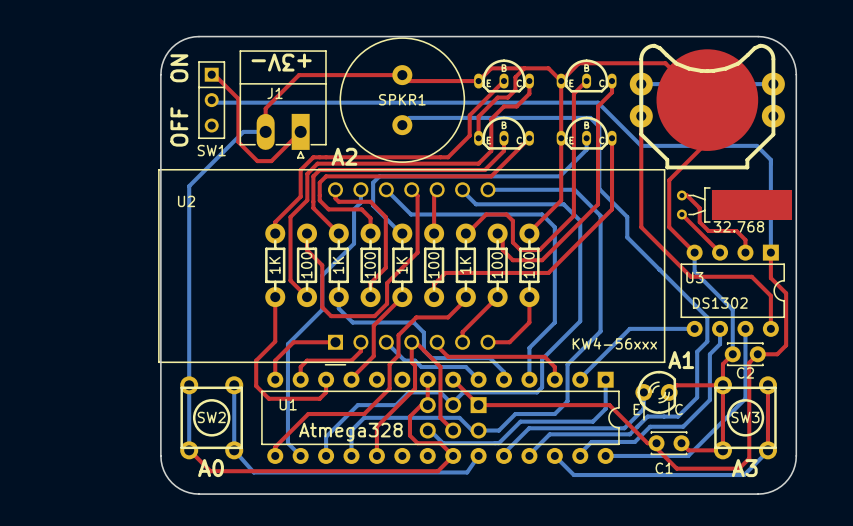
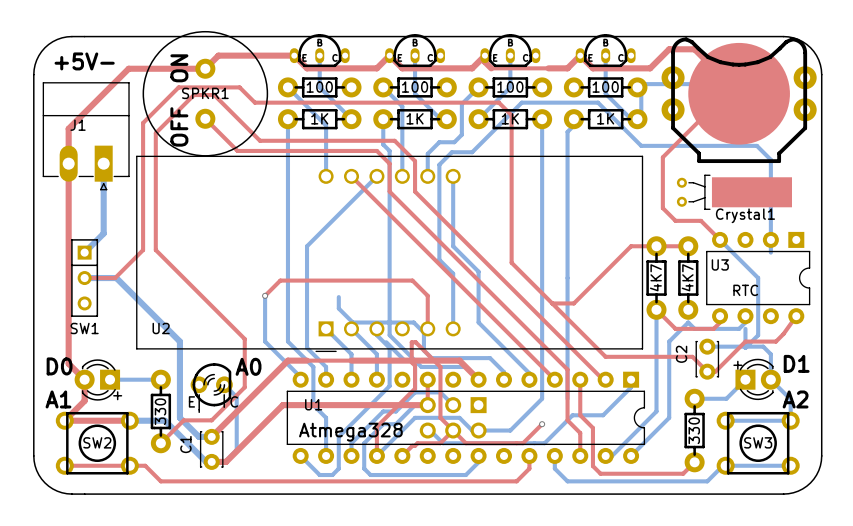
board edge: (199, 36) (184, 39) (172, 47) (163, 60) (160, 74) (161, 460) (163, 470) (172, 482) (184, 491) (199, 494) -> (199, 36) (62, 37) (48, 44) (41, 51) (36, 60) (33, 74) (33, 455) (36, 470) (48, 486) (66, 493) (199, 494)
board edge: (758, 36) (772, 39) (785, 47) (793, 60) (796, 74) (795, 460) (791, 475) (785, 482) (772, 491) (758, 494) -> (758, 36) (788, 36) (802, 41) (816, 55) (821, 74) (821, 460) (816, 475) (802, 488) (788, 493) (758, 494)
part: none -> (319, 50)
part: none -> (415, 50)
bottom track: none -> (319, 55) (319, 87) (351, 119)
bottom track: none -> (415, 55) (415, 93) (440, 119) (446, 119)
bottom track: none -> (510, 55) (510, 87) (478, 119)
bottom track: none -> (605, 55) (605, 93) (631, 119) (637, 119)
text: none -> +5V- (84, 61)
text: +3V- (281, 62) -> none
top track: (491, 68) (478, 81) (408, 81) (402, 75) (299, 75) (265, 108) (265, 131) -> (491, 68) (484, 61) (484, 55) (472, 68) (402, 68) (389, 55) (376, 68) (307, 68) (294, 55) (218, 55) (205, 68) (128, 68) (68, 128) (68, 363) (84, 379) (84, 400) (64, 420) (129, 420)
top track: (524, 68) (515, 77) (515, 89) (507, 97) (497, 97) (478, 116) (478, 138) -> none
top track: (548, 68) (561, 81) -> (548, 68) (567, 68) (580, 55) (592, 68) (650, 68) (669, 49) (694, 49) (739, 93)
top track: (211, 74) (216, 77) (238, 98) (238, 142) (257, 161) (271, 161) (300, 131) -> none
part position: (504, 75) -> (510, 50)
part position: (586, 75) -> (605, 50)
top track: (504, 81) (469, 115) (469, 135) (448, 157) (313, 157) (300, 170) (300, 196) (275, 222) (275, 233) -> none
top track: (529, 81) (529, 93) (516, 106) (504, 106) (491, 119) (491, 150) (478, 163) (317, 163) (307, 173) (307, 200) (290, 217) (290, 280) (307, 297) -> none
top track: (561, 81) (578, 63) (665, 63) (702, 100) (707, 100) (707, 142) (669, 180) (669, 227) (694, 252) -> none
top track: (561, 81) (561, 200) (529, 233) -> none
top track: (586, 81) (573, 93) (573, 215) (539, 250) (520, 250) (512, 242) (512, 220) (506, 214) (486, 214) (465, 233) -> none
top track: (612, 81) (612, 92) (598, 106) (598, 204) (542, 260) (512, 260) (502, 250) (502, 238) (497, 233) -> none
bottom track: none -> (287, 87) (326, 125) (326, 176)
part: none -> 100 (319, 87)
bottom track: none -> (383, 87) (402, 106) (402, 176)
part: none -> 100 (415, 87)
bottom track: none -> (478, 87) (461, 104) (461, 134) (454, 142) (439, 142) (427, 153) (427, 176)
part: none -> 100 (510, 87)
part: none -> 100 (605, 87)
top track: none -> (739, 93) (726, 93) (662, 157) (662, 208) (675, 220) (700, 220) (720, 239)
bottom track: (211, 100) (214, 102) (521, 102) -> (453, 328) (453, 273) (439, 259) (439, 164) (451, 152) (472, 152) (521, 102)
SW1 position: (211, 100) -> (84, 278)
SPKR1 position: (402, 100) -> (205, 93)
part: none -> (739, 100)
J1 position: (283, 104) -> (86, 136)
part: (707, 106) -> none
top track: (641, 116) (641, 227) (690, 276) (751, 276) (770, 295) (770, 328) -> none
top track: none -> (205, 118) (237, 150) (376, 150) (389, 163) (389, 191) (567, 369) (567, 420) (580, 433) (580, 455)
part: none -> 1K (319, 119)
bottom track: none -> (383, 119) (383, 144) (389, 150) (389, 335) (415, 360) (415, 392) (395, 411) (383, 411) (351, 443)
part: none -> 1K (415, 119)
part: none -> 1K (510, 119)
part: none -> 1K (605, 119)
bottom track: (402, 125) (409, 117) (590, 117) (599, 126) (599, 189) (627, 217) (627, 237) (707, 317) (707, 341) (697, 351) (697, 397) (678, 416) (647, 416) (629, 434) (549, 434) (529, 455) -> none
bottom track: (265, 131) (243, 131) (189, 186) (189, 450) -> none
part: (504, 133) -> none
part: (586, 133) -> none
top track: (504, 138) (504, 150) (484, 170) (319, 170) (313, 176) (313, 208) (338, 233) -> none
top track: (529, 138) (491, 176) (326, 176) (319, 182) (319, 200) (328, 209) (361, 209) (370, 218) (370, 233) -> none
bottom track: (586, 138) (586, 149) (559, 176) (379, 176) (373, 182) (373, 205) (402, 233) -> none
top track: (612, 138) (612, 209) (548, 272) (445, 272) (434, 284) (434, 297) -> none
text: A2 (344, 156) -> none
bottom track: none -> (103, 163) (103, 233) (84, 252)
U2 footprint: [158, 169, 666, 366] -> [136, 155, 644, 352]
bottom track: none -> (376, 176) (307, 246) (307, 347) (326, 366) (326, 379)
top track: (335, 189) (335, 198) (338, 201) (370, 201) (385, 217) (385, 267) (370, 283) (370, 297) -> none
bottom track: (360, 189) (360, 202) (354, 209) (354, 243) (322, 275) (322, 309) (287, 344) (287, 443) (300, 455) -> (376, 328) (376, 335) (389, 347) (389, 386) (338, 436) (338, 468) (332, 475) (319, 475) (300, 455)
bottom track: (386, 189) (411, 214) (542, 214) (554, 227) (554, 322) (529, 347) (529, 373) -> (453, 176) (453, 246) (478, 271) (478, 322) (529, 373)
top track: (411, 189) (417, 195) (417, 252) (387, 283) (387, 303) (374, 316) (331, 316) (322, 307) (322, 265) (307, 250) (307, 233) -> none
top track: (437, 189) (434, 192) (434, 233) -> none
bottom track: (462, 189) (476, 204) (563, 204) (580, 220) (580, 321) (542, 359) -> (542, 119) (542, 359)
bottom track: (487, 189) (574, 189) (600, 215) (600, 331) (567, 364) -> (573, 119) (573, 125) (567, 131) (567, 364)
Crystal1: none -> (734, 192)
top track: (681, 195) (687, 195) (699, 208) (699, 222) (708, 231) (736, 231) (745, 239) (745, 252) -> none
U2 name position: U2 (186, 201) -> U2 (161, 328)
part: 32.768 (734, 204) -> none
top track: (681, 214) (720, 252) -> none
bottom track: none -> (720, 239) (758, 278) (758, 335) (745, 347)
top track: none -> (688, 246) (631, 246) (573, 303) (552, 303)
bottom track: (694, 252) (694, 271) (732, 309) (732, 354) -> none
top track: (770, 252) (770, 278) (786, 293) (786, 345) (777, 354) (757, 354) (749, 362) (749, 458) (739, 468) (676, 468) (656, 448) (656, 443) (647, 443) (609, 405) (478, 405) (453, 379) -> none
part: 1K (275, 265) -> none
part: 100 (307, 265) -> none
part: 1K (338, 265) -> none
part: 100 (370, 265) -> none
part: 1K (402, 265) -> none
part: 100 (434, 265) -> none
part: 1K (465, 265) -> none
part: 100 (497, 265) -> none
part: 100 (529, 265) -> none
bottom track: none -> (84, 278) (116, 278) (179, 341) (179, 417) (199, 436) (211, 436)
part: none -> 4K7 (656, 278)
part: none -> 4K7 (688, 278)
U3 position: (732, 290) -> (758, 278)
top track: none -> (265, 295) (280, 280) (412, 280) (427, 295) (427, 328)
bottom track: none -> (265, 295) (265, 341) (300, 377) (300, 379)
via: none -> (265, 295)
top track: (275, 297) (275, 341) (256, 360) (256, 386) (268, 398) (319, 398) (326, 392) (326, 379) -> none
top track: (402, 297) (373, 325) (373, 356) (351, 379) -> none
top track: (465, 297) (465, 299) (448, 317) (416, 317) (398, 335) (398, 355) (389, 364) (389, 388) (364, 414) (308, 414) (275, 447) (275, 455) -> none
top track: (497, 297) (462, 332) (462, 342) -> none
top track: (529, 297) (529, 322) (509, 342) (487, 342) -> none
U3 value: DS1302 (720, 303) -> RTC (745, 290)
top track: none -> (656, 309) (675, 328) (713, 328) (720, 322) (720, 316)
bottom track: none -> (745, 316) (745, 322) (739, 328) (694, 328) (688, 322) (669, 341) (669, 417) (631, 455)
top track: none -> (796, 316) (775, 341) (745, 341) (732, 354)
bottom track: none -> (326, 328) (351, 354) (351, 379)
bottom track: none -> (351, 328) (376, 354) (376, 379)
bottom track: (694, 328) (629, 328) (580, 379) -> none
bottom track: (720, 328) (720, 344) (709, 354) (709, 400) (683, 426) (650, 426) (634, 441) (591, 441) (580, 453) -> none
top track: (335, 342) (293, 342) (275, 360) (275, 379) -> none
top track: (360, 342) (360, 351) (351, 360) -> (478, 379) (459, 360) (351, 360)
top track: (437, 342) (437, 345) (448, 356) (544, 356) (554, 366) (554, 379) -> (351, 176) (554, 379)
U2 value: KW4-56xxx (614, 343) -> none
bottom track: none -> (707, 346) (763, 346) (770, 354) (770, 379) (790, 399) (790, 420) (725, 420)
bottom track: (745, 347) (745, 398) (688, 455) (612, 455) -> (656, 309) (656, 411) (612, 455)
C2 rotation: 0° (745, 354) -> 90° clockwise (707, 359)
C2 position: (745, 354) -> (707, 359)
top track: (307, 360) (300, 366) (300, 379) -> (307, 360) (287, 360) (211, 436)
text: A1 (681, 360) -> none
text: none -> D1 (796, 363)
top track: (722, 364) (722, 450) (688, 450) (681, 443) -> (722, 364) (715, 371) (707, 371) (692, 356) (605, 356) (511, 262) (511, 115) (498, 102) (254, 102) (239, 87) (178, 87) (143, 122) (143, 250) (115, 278) (84, 278)
text: none -> D0 (59, 366)
part: none -> (97, 379)
bottom track: none -> (110, 379) (160, 379)
top track: none -> (580, 379) (580, 415) (592, 427) (592, 466) (600, 473) (683, 473) (694, 462)
top track: none -> (605, 379) (603, 379) (415, 191) (415, 161) (394, 140) (260, 140) (214, 95) (193, 95) (155, 133) (155, 250) (244, 339) (244, 387) (211, 420) (183, 420) (160, 443) (167, 443)
bottom track: (605, 379) (605, 408) (592, 421) (520, 421) (498, 443) -> (631, 379) (631, 387) (603, 415) (572, 415) (544, 443) (498, 443)
bottom track: none -> (745, 379) (726, 398) (694, 398)
part: none -> (758, 379)
bottom track: none -> (224, 384) (236, 397) (236, 449) (224, 461) (211, 461)
bottom track: (234, 385) (234, 450) (253, 472) (467, 472) (478, 455) -> (427, 405) (415, 405) (395, 424) (383, 424) (364, 443) (364, 468) (370, 475) (465, 475) (478, 462) (478, 455)
top track: (722, 385) (676, 385) (669, 392) -> none
top track: (767, 385) (767, 450) -> none
bottom track: (542, 387) (537, 392) (463, 392) (453, 402) -> none
part: none -> (211, 388)
bottom track: (415, 392) (408, 392) (395, 405) (357, 405) (326, 436) -> (287, 119) (287, 341) (313, 366) (313, 405) (326, 417) (326, 436)
bottom track: (643, 392) (643, 408) (624, 428) (529, 428) (504, 453) -> none
part: (656, 395) -> none
bottom track: (567, 398) (567, 401) (554, 414) (515, 414) (498, 430) -> (542, 387) (542, 398) (510, 430) (498, 430)
text: none -> A1 (58, 399)
text: none -> A2 (795, 399)
top track: (421, 405) (409, 416) (409, 435) (417, 443) -> (402, 455) (417, 443)
top track: none -> (421, 405) (282, 405) (226, 461) (211, 461)
part: none -> 330 (160, 411)
SW2 rotation: 0° (211, 417) -> 90° clockwise (97, 443)
SW2 position: (211, 417) -> (97, 443)
bottom track: (415, 417) (364, 417) (351, 430) (351, 443) -> (415, 417) (376, 455)
U1 position: (440, 417) -> (465, 417)
SW3 rotation: 0° (745, 417) -> 90° clockwise (758, 443)
bottom track: none -> (129, 420) (164, 420) (206, 461) (218, 461)
via: none -> (542, 424)
part: none -> 330 (694, 430)
top track: (440, 443) (453, 455) -> (440, 443) (453, 430) (465, 443) (523, 443) (542, 424)
C1 rotation: 0° (669, 443) -> 90° clockwise (211, 449)
C1 position: (669, 443) -> (211, 449)
top track: (189, 450) (210, 471) (437, 471) (453, 455) -> none
bottom track: (767, 450) (744, 475) (573, 475) (554, 455) -> (790, 465) (722, 465) (707, 481) (567, 481) (554, 468) (554, 455)
top track: none -> (529, 455) (529, 468) (516, 481) (160, 481) (145, 465) (64, 465)
text position: A0 (211, 468) -> A0 (248, 366)
text: A3 (744, 468) -> none

